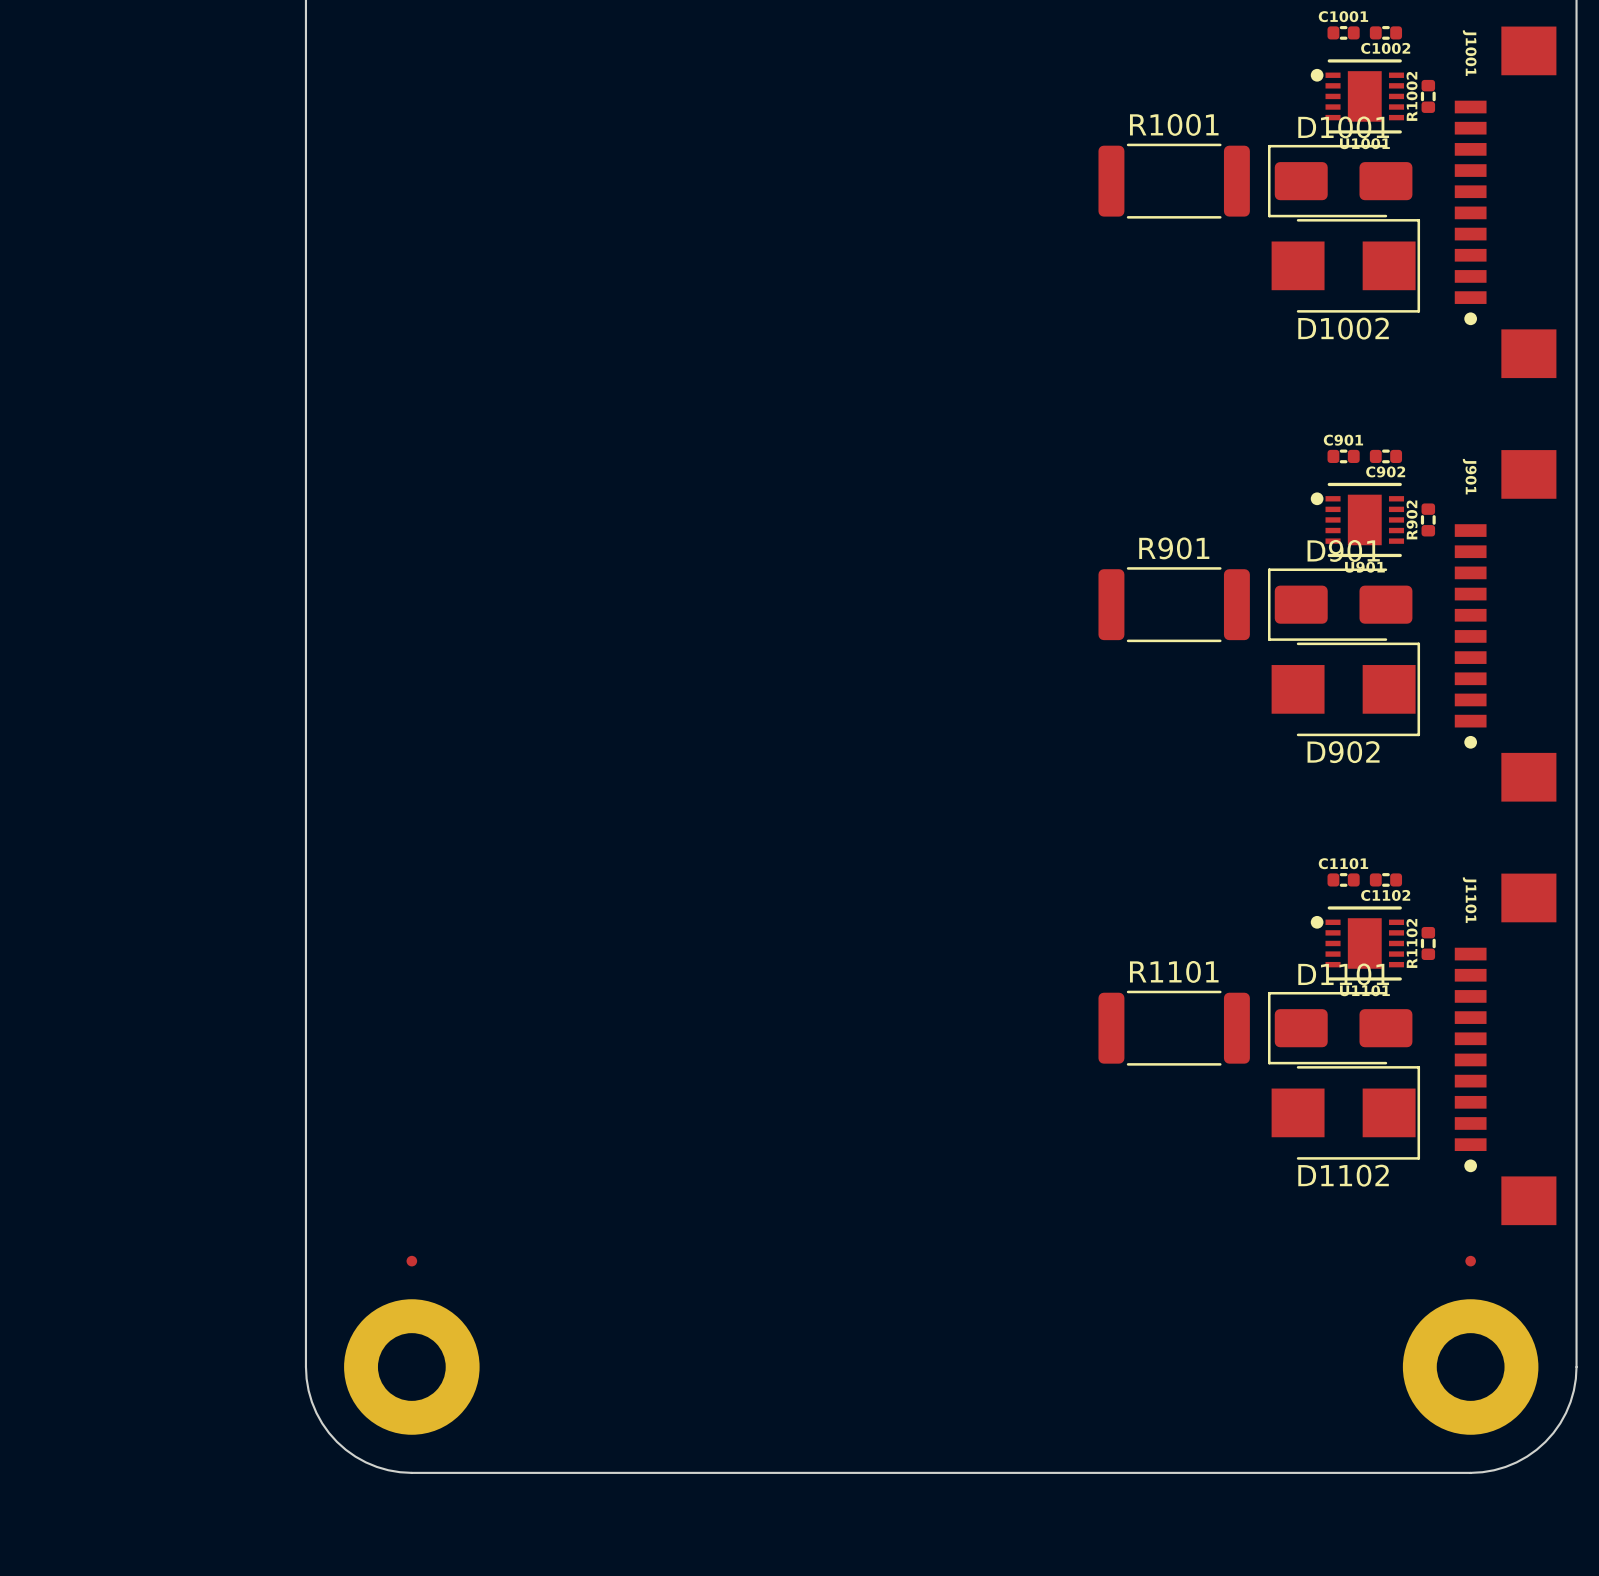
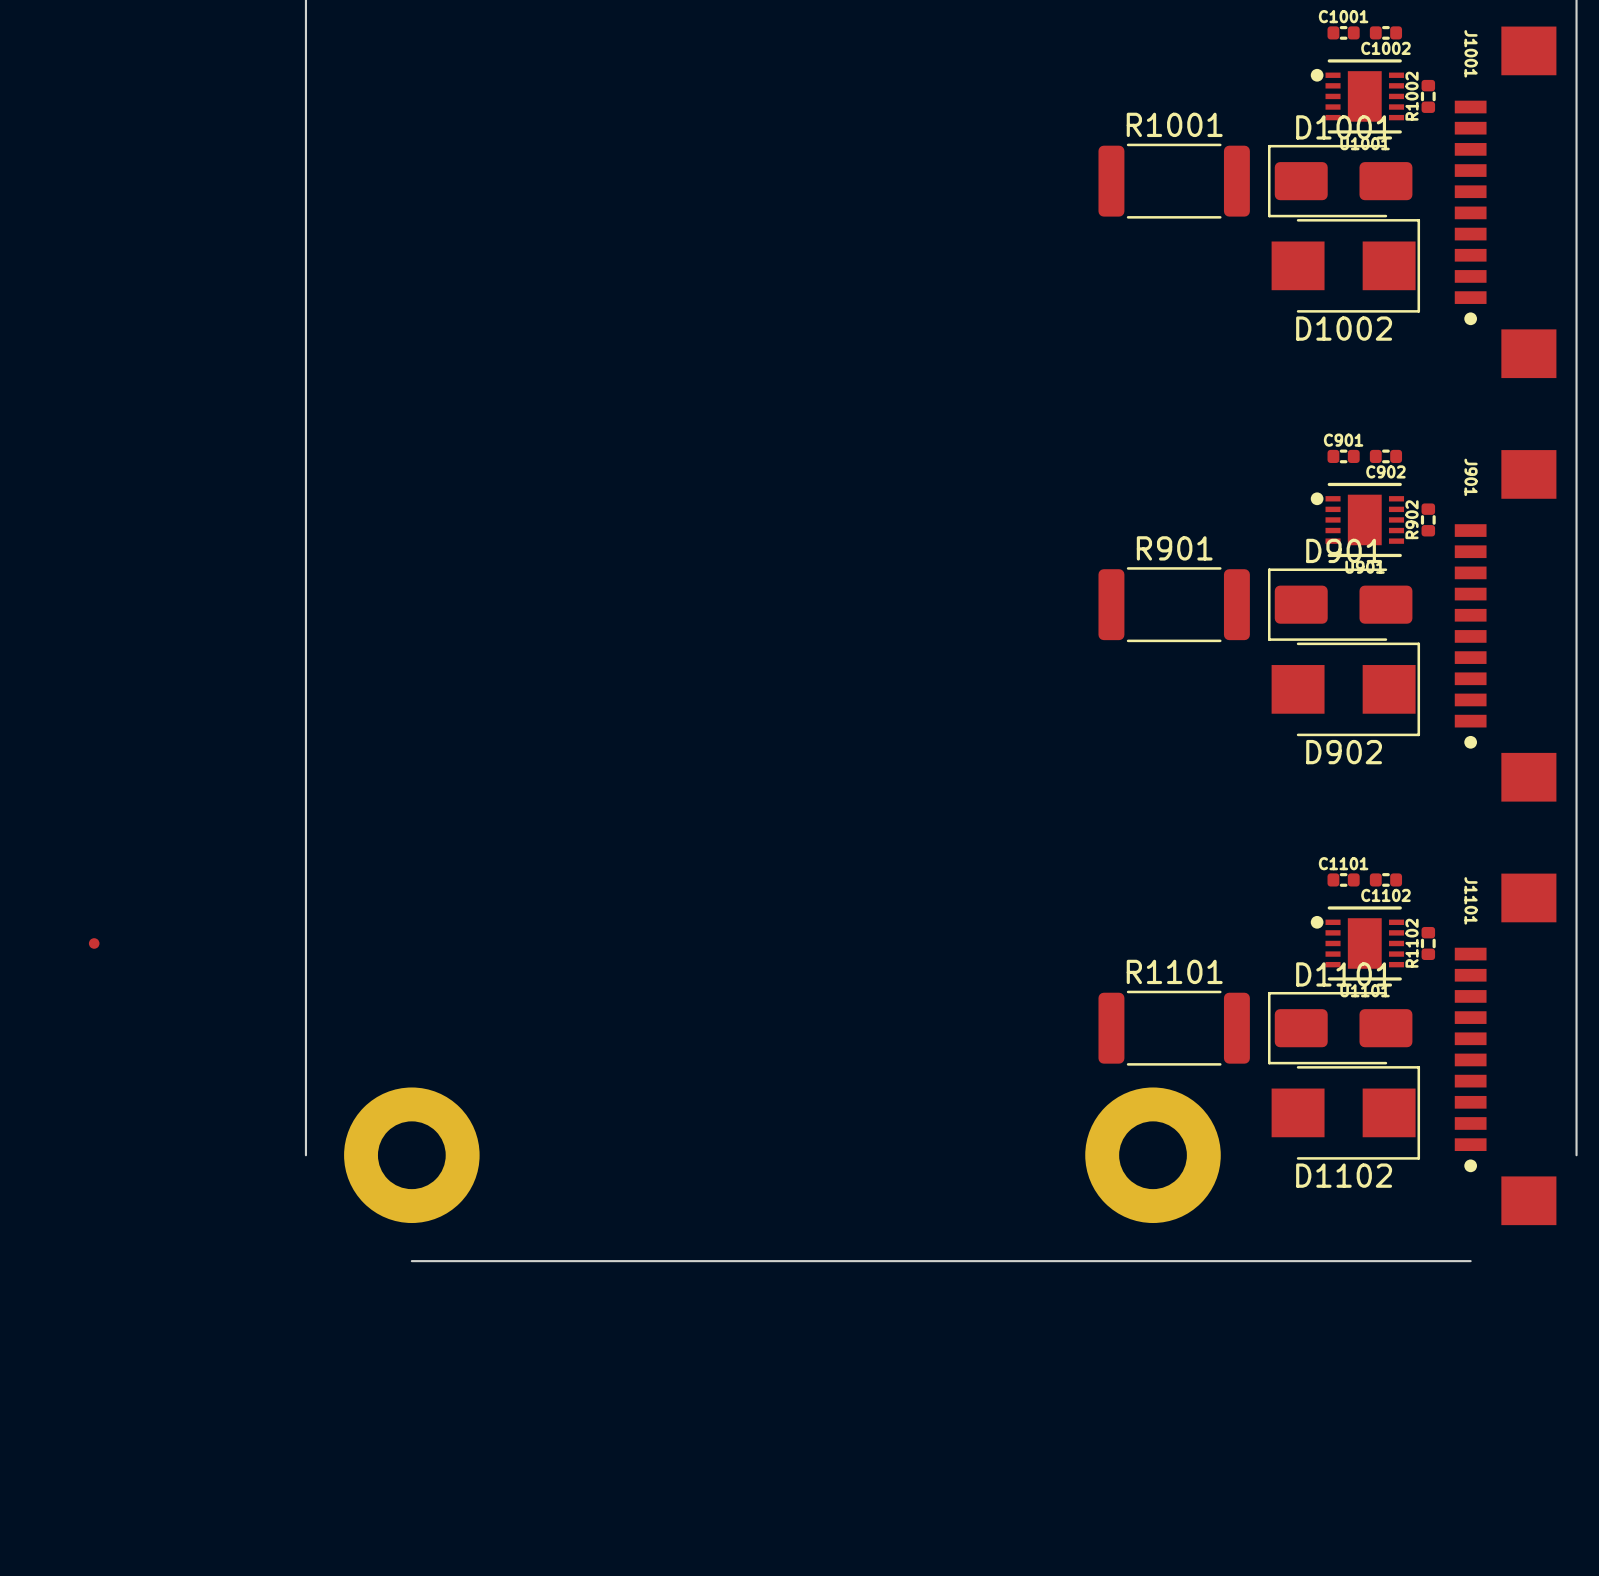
board edge: (305, 1155) (305, 1367) (311, 1401) (329, 1433) (355, 1456) (388, 1470) (411, 1472) (1470, 1472) (1494, 1470) (1516, 1462) (1545, 1441) (1566, 1412) (1573, 1390) (1576, 1367) (1576, 1155) -> none
board edge: none -> (411, 1261) (1470, 1261)
part position: (411, 1261) -> (94, 943)
part: (1470, 1261) -> none
part position: (411, 1367) -> (411, 1155)
part position: (1470, 1367) -> (1153, 1155)

